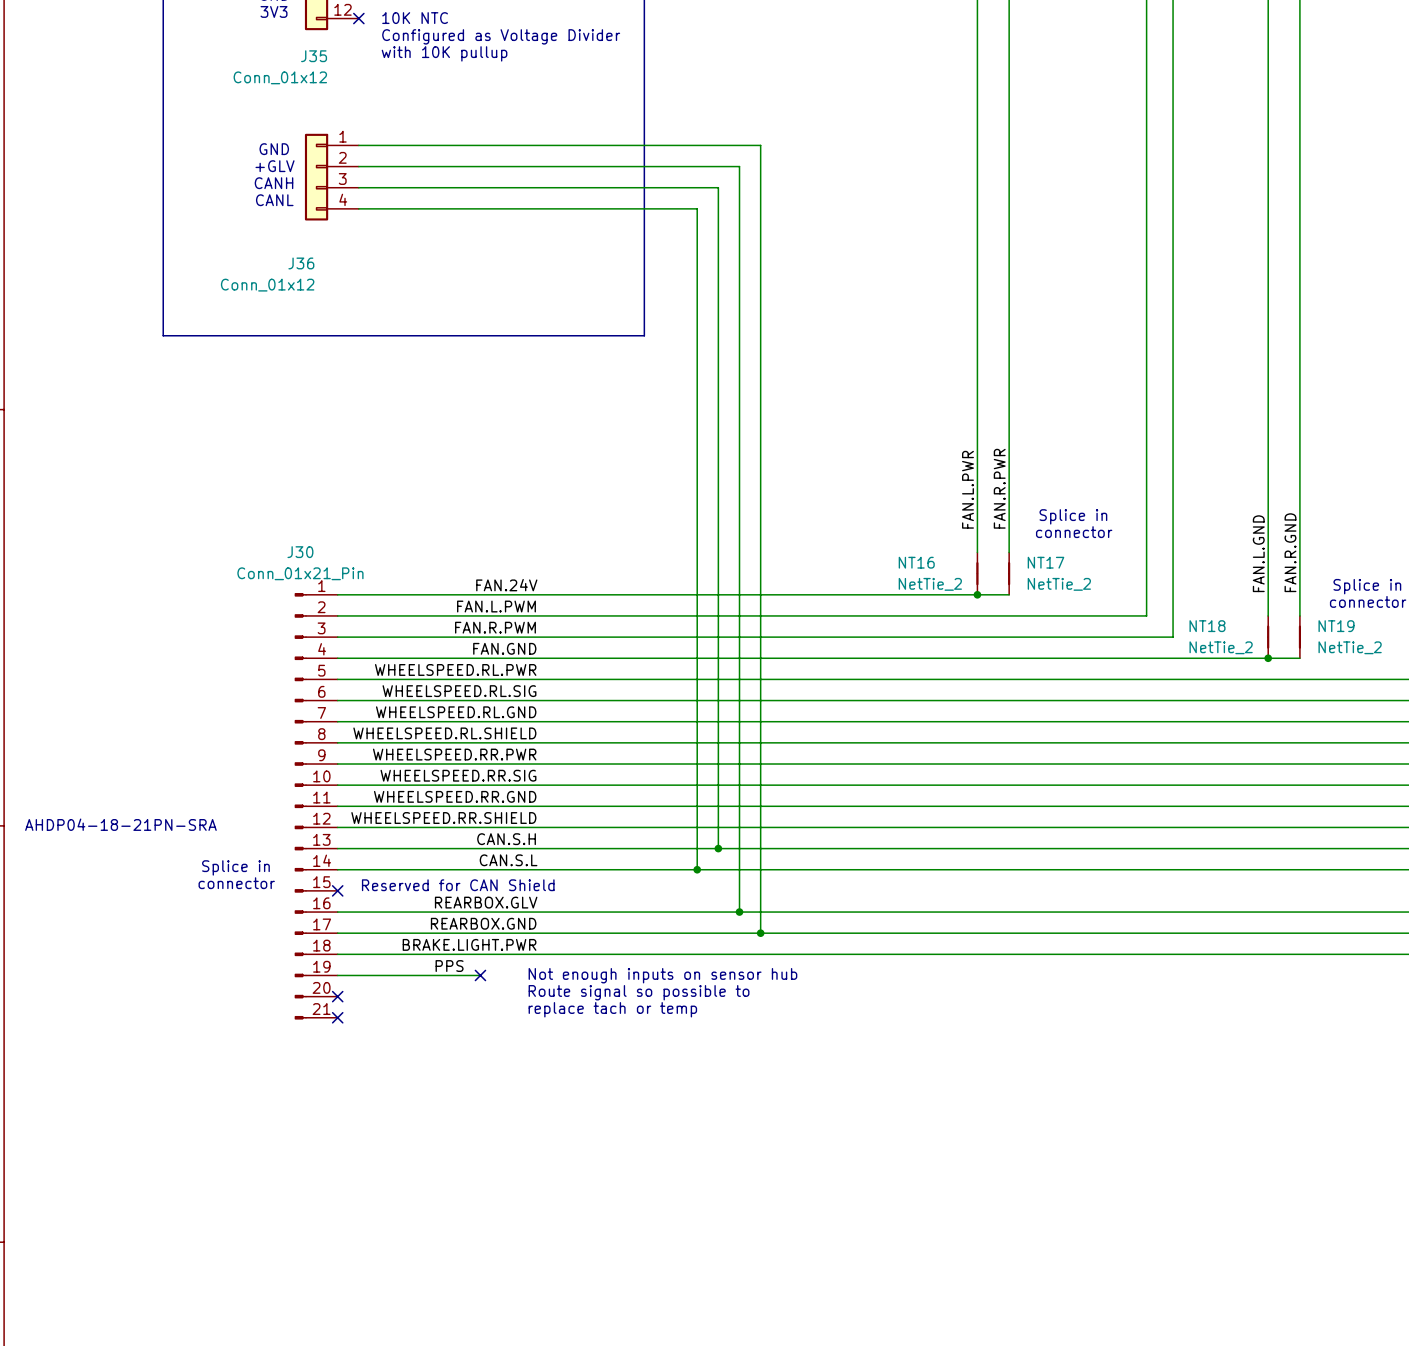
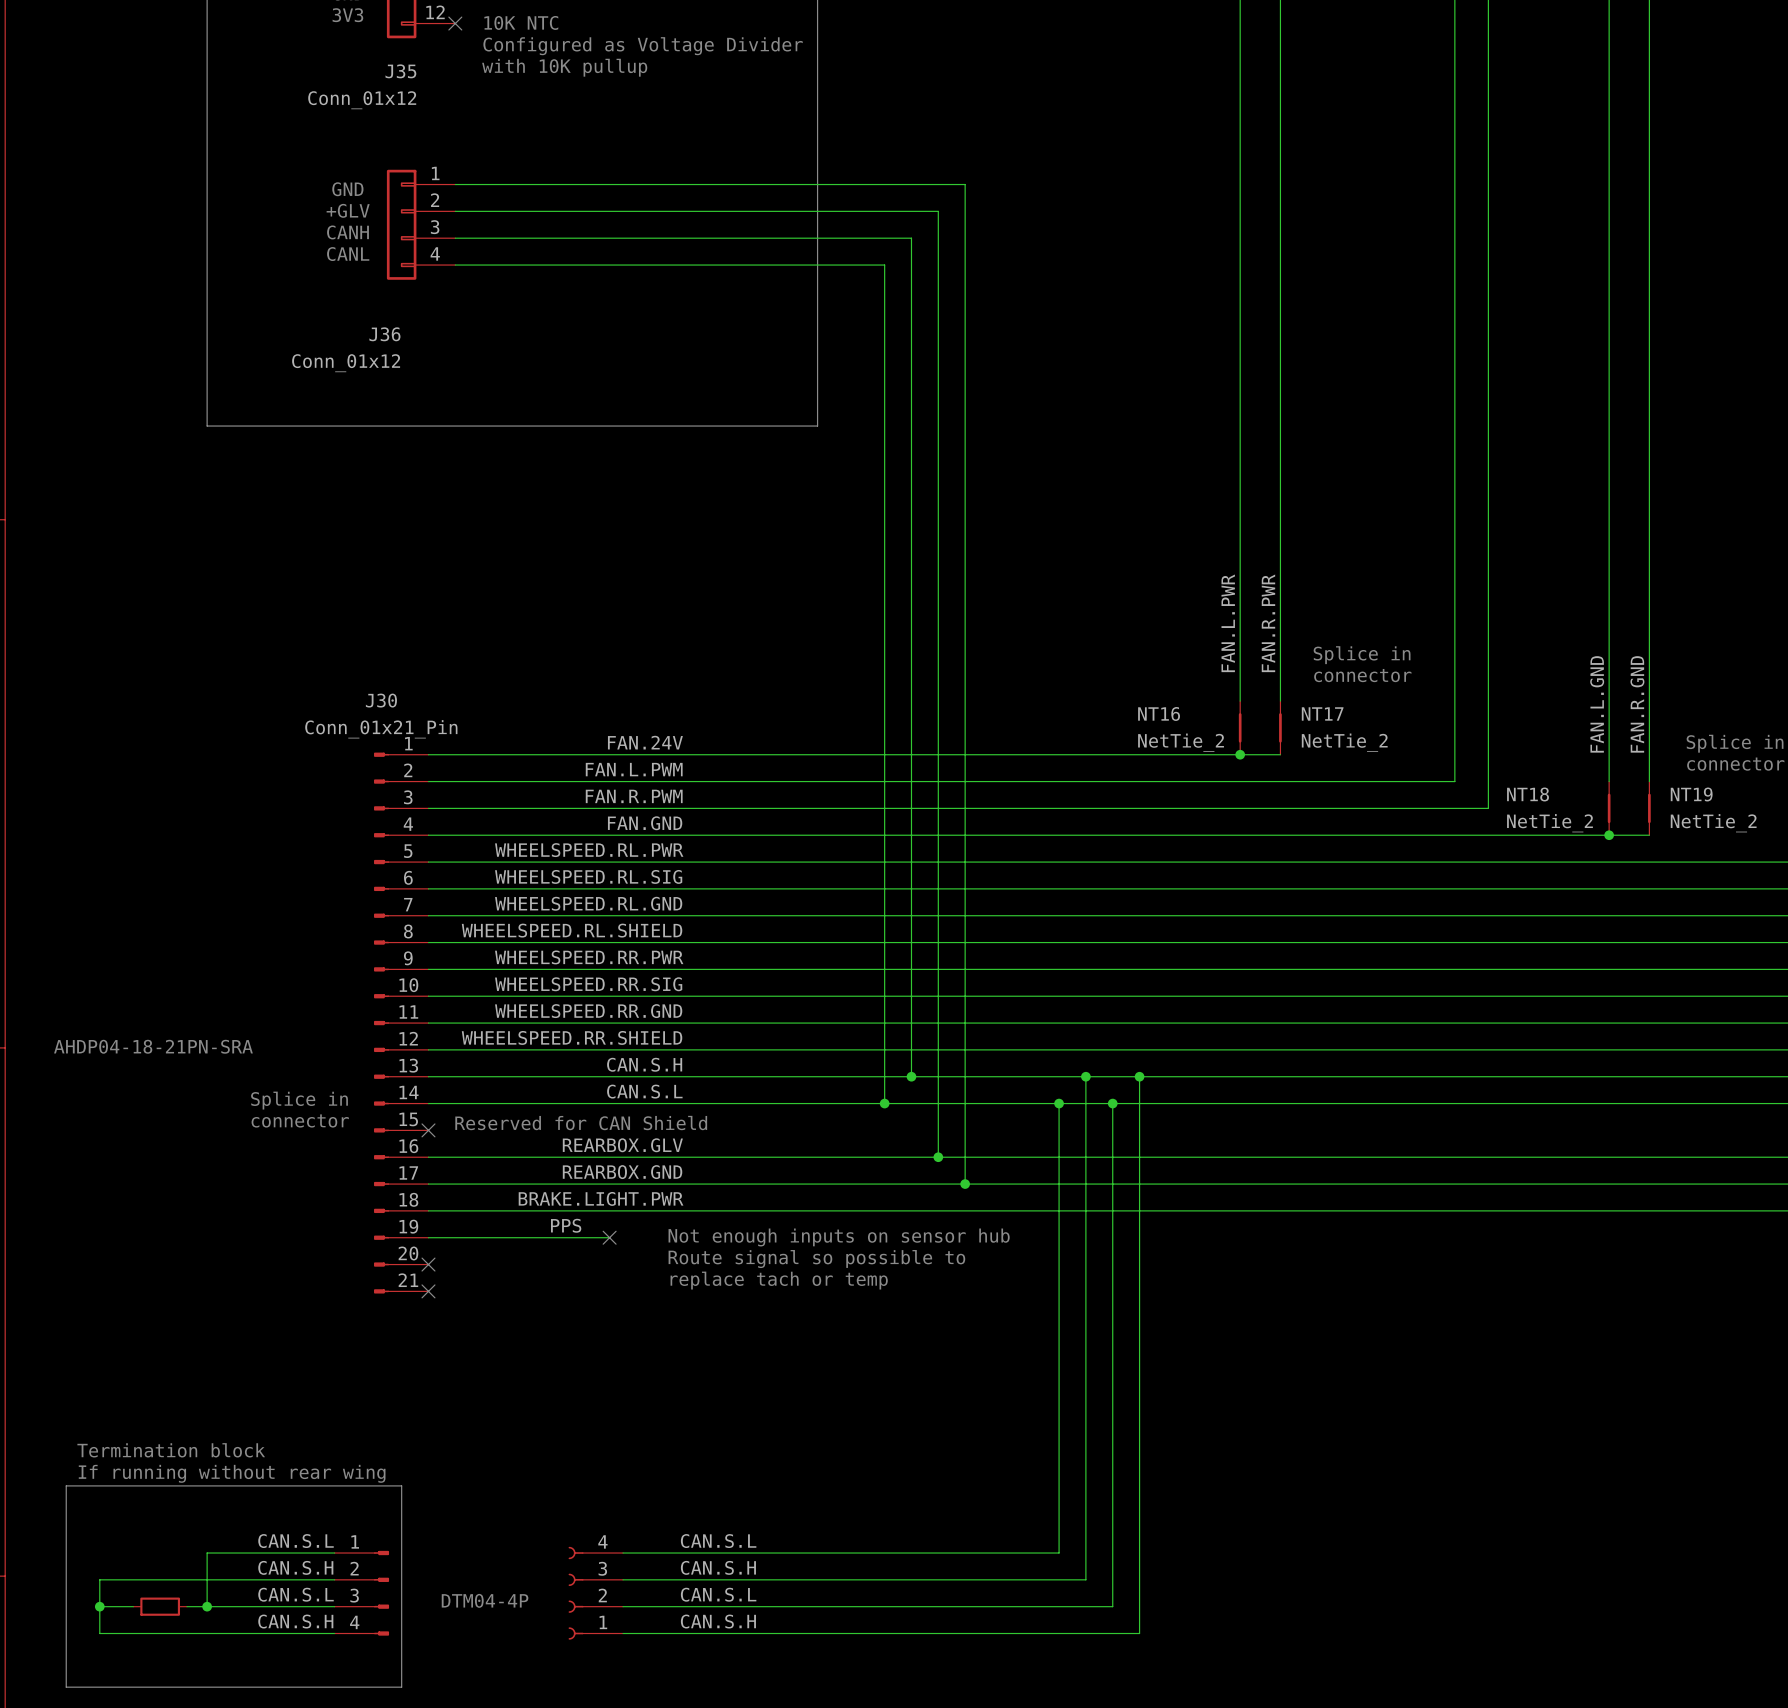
wire: none -> (1085, 1076) (1085, 1579) (623, 1579)
junction: none -> (1085, 1076)
wire: none -> (1139, 1076) (1139, 1633) (623, 1633)
junction: none -> (1139, 1076)
wire: none -> (1059, 1103) (1059, 1553) (623, 1553)
junction: none -> (1059, 1103)
wire: none -> (1112, 1103) (1112, 1606) (623, 1606)
junction: none -> (1112, 1103)
text: none -> Termination block (171, 1450)
text: none -> If running without rear wing (232, 1473)
line: none -> (66, 1485) (401, 1485) (401, 1687) (66, 1687) (66, 1485)
label: none -> CAN.S.L (296, 1541)
label: none -> CAN.S.L (718, 1541)
wire: none -> (334, 1553) (207, 1553) (207, 1606)
label: none -> CAN.S.H (295, 1567)
label: none -> CAN.S.H (718, 1567)
wire: none -> (334, 1579) (99, 1579) (99, 1633) (334, 1633)
part: none -> (361, 1593)
part: none -> (595, 1593)
label: none -> CAN.S.L (296, 1594)
label: none -> CAN.S.L (718, 1594)
text: none -> DTM04-4P (485, 1600)
wire: none -> (99, 1606) (133, 1606)
junction: none -> (99, 1606)
part: none -> (160, 1606)
wire: none -> (186, 1606) (334, 1606)
junction: none -> (207, 1606)
label: none -> CAN.S.H (295, 1621)
label: none -> CAN.S.H (718, 1621)

